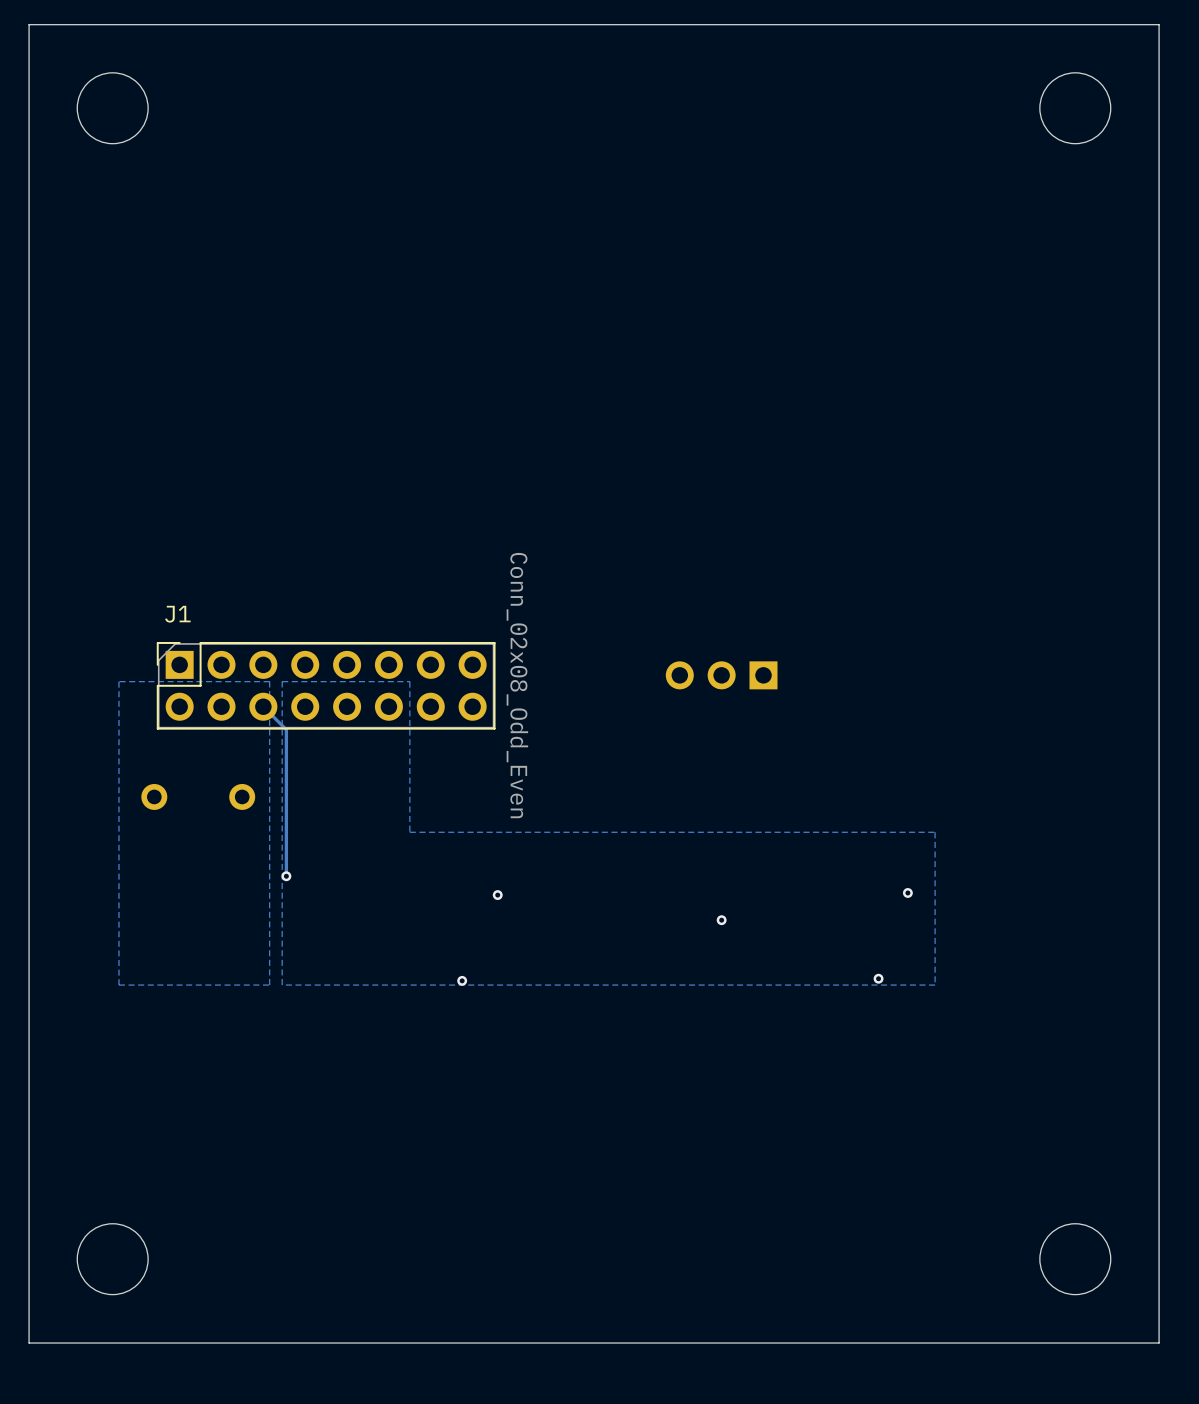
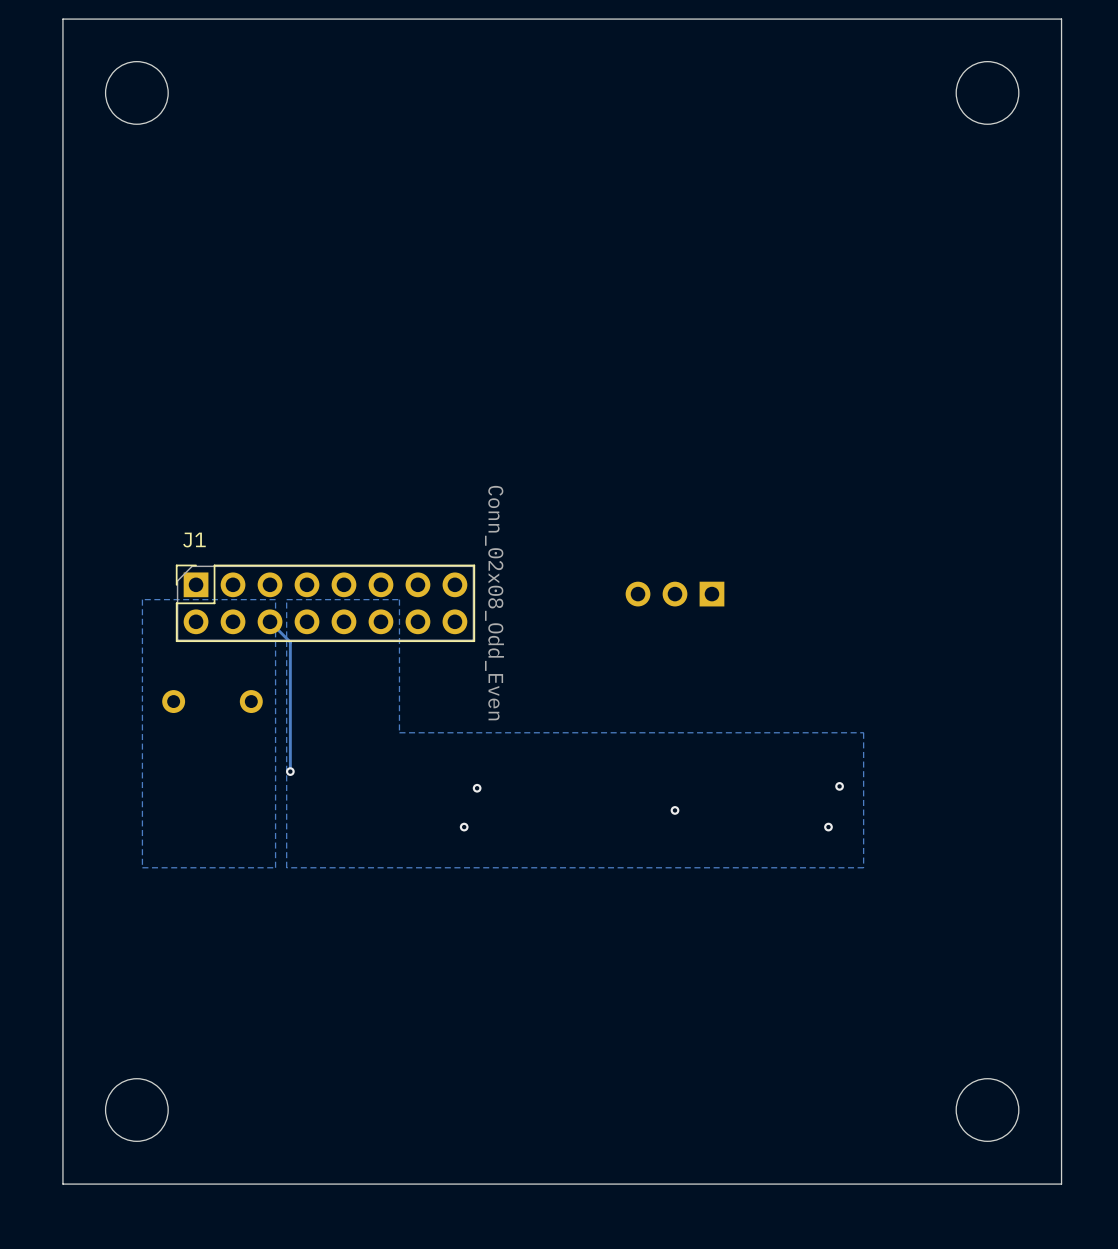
via position: (878, 978) -> (828, 827)
via position: (462, 980) -> (464, 827)

